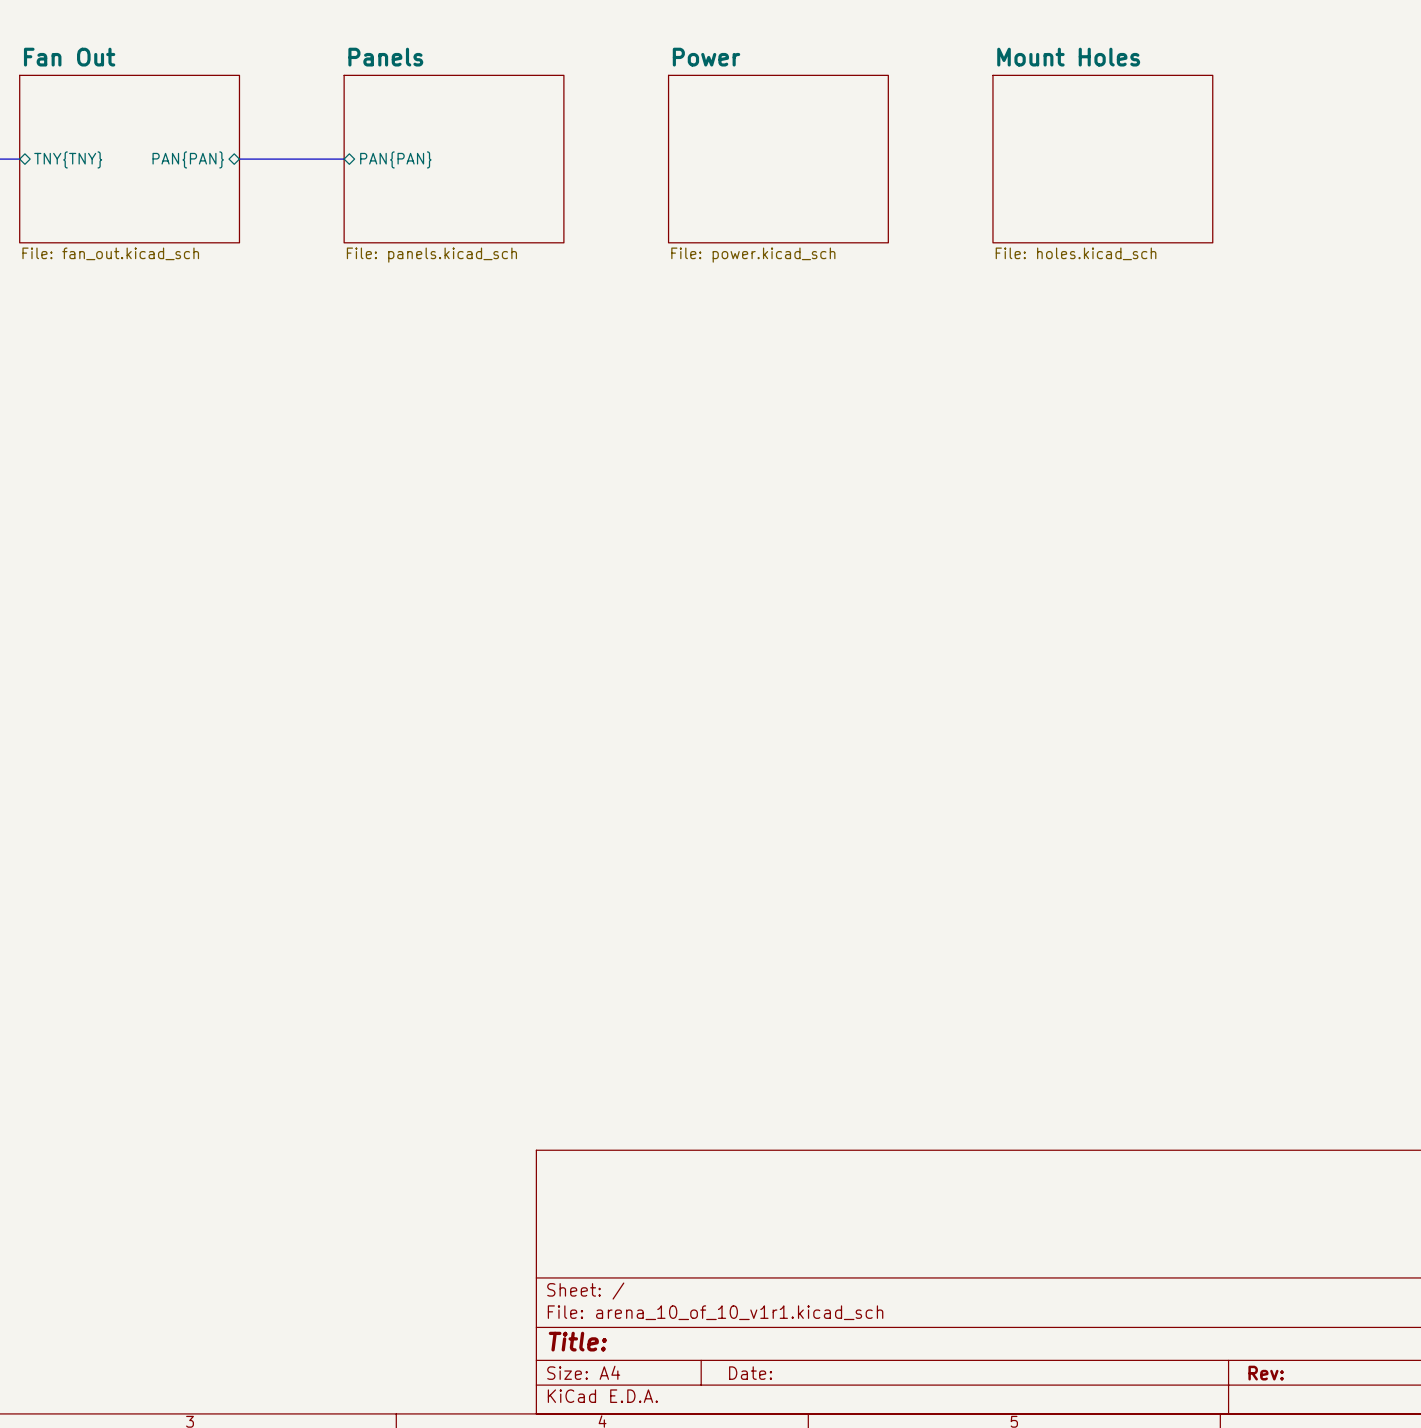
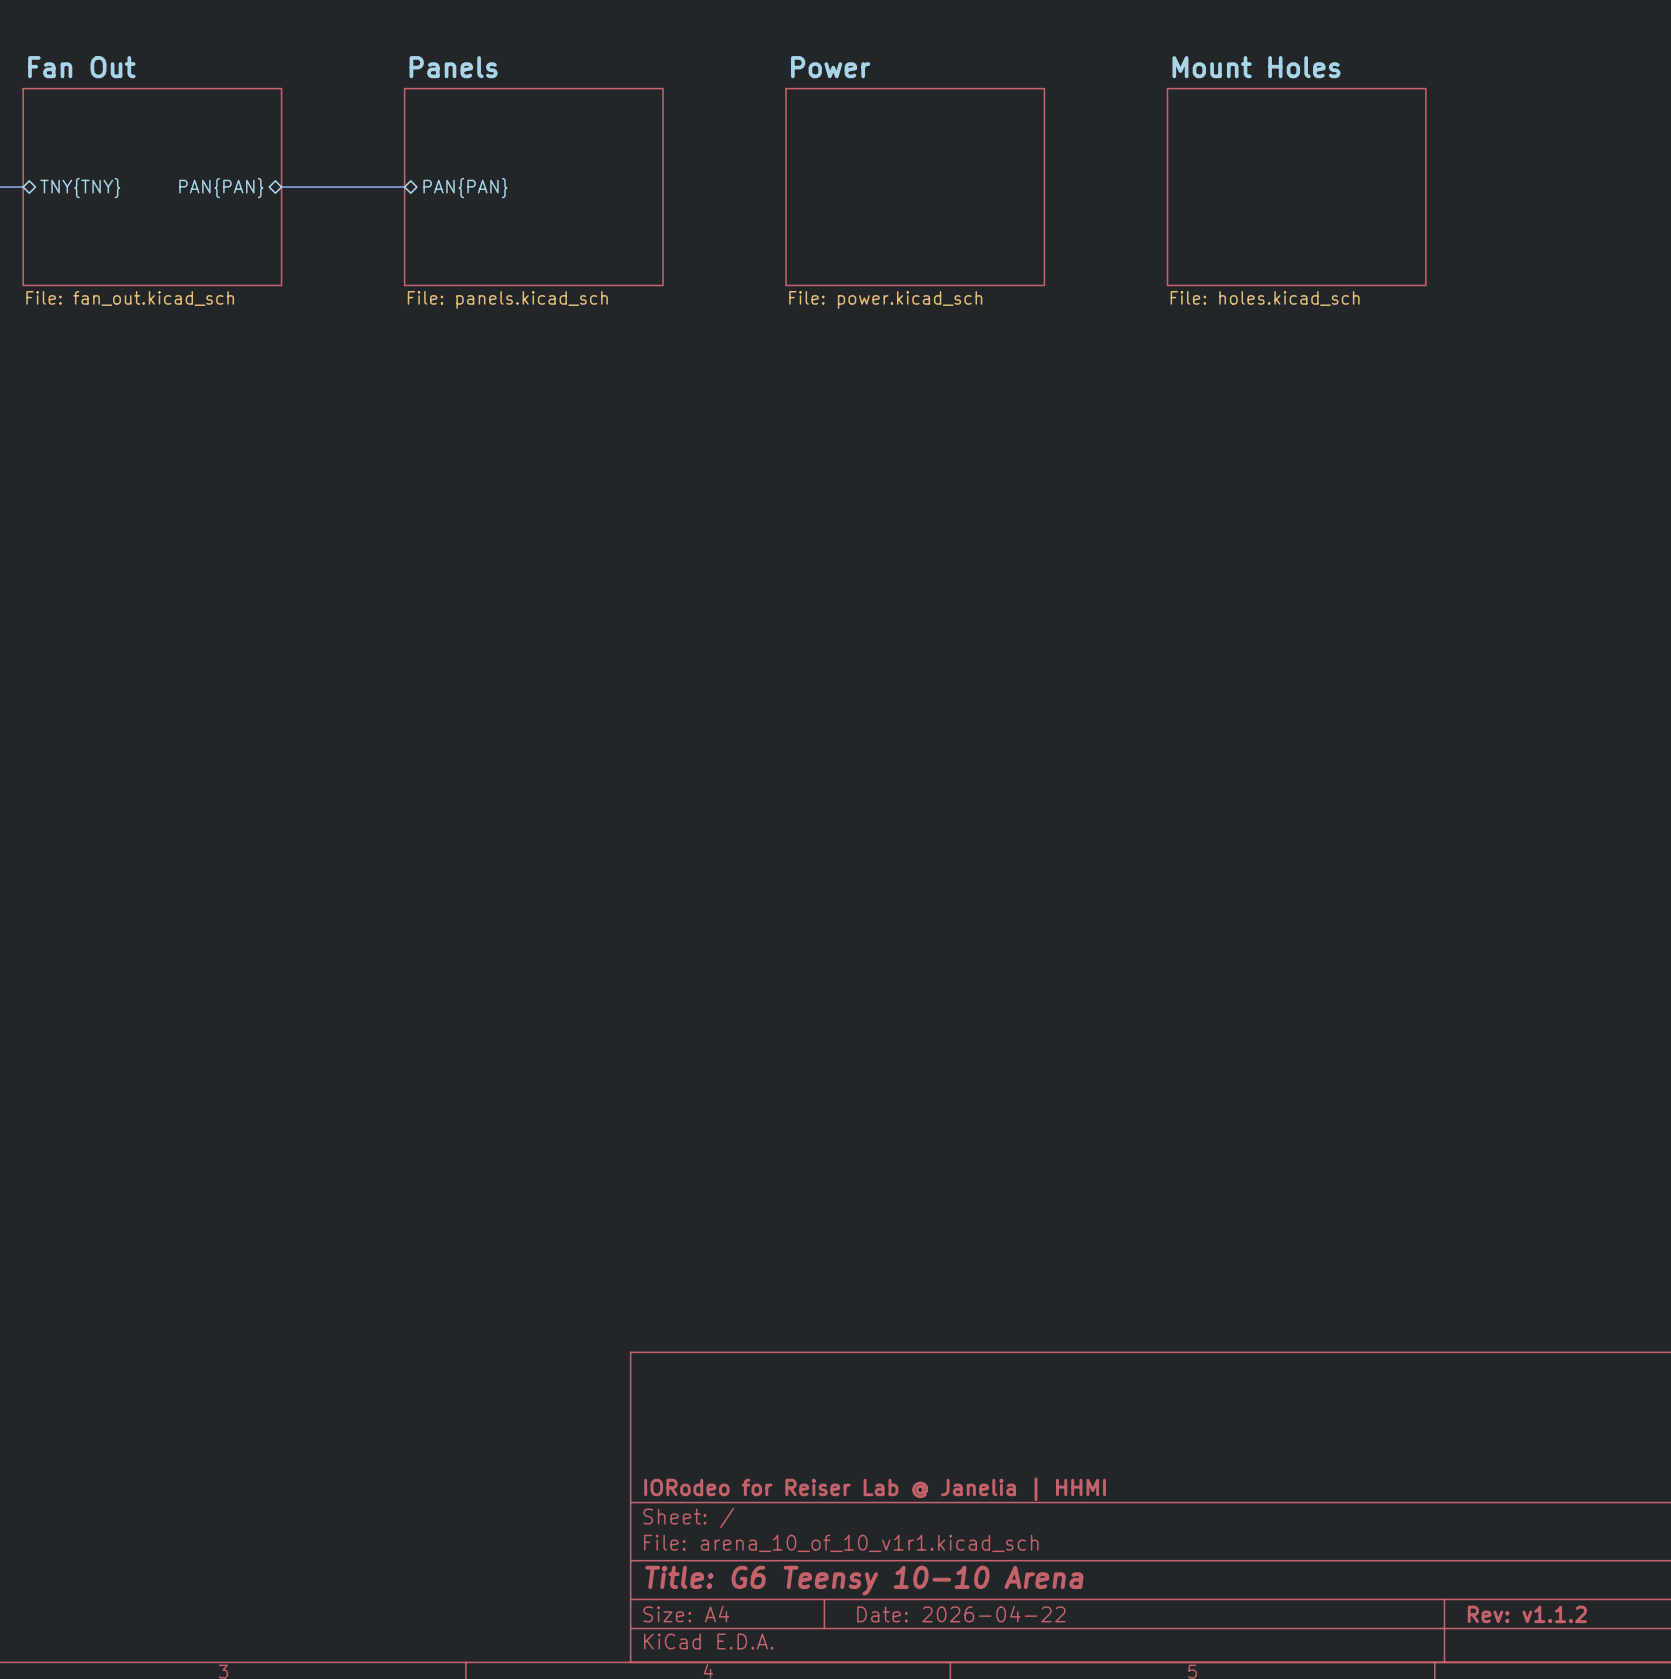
title block: none -> IORodeo for Reiser Lab @ Janelia | HHMI (875, 1489)
title block: Title: (577, 1341) -> Title: G6 Teensy 10-10 Arena (864, 1580)
title block: Date: (750, 1373) -> Date: 2026-04-22 (961, 1614)
title block: Rev: (1266, 1373) -> Rev: v1.1.2 (1527, 1614)

